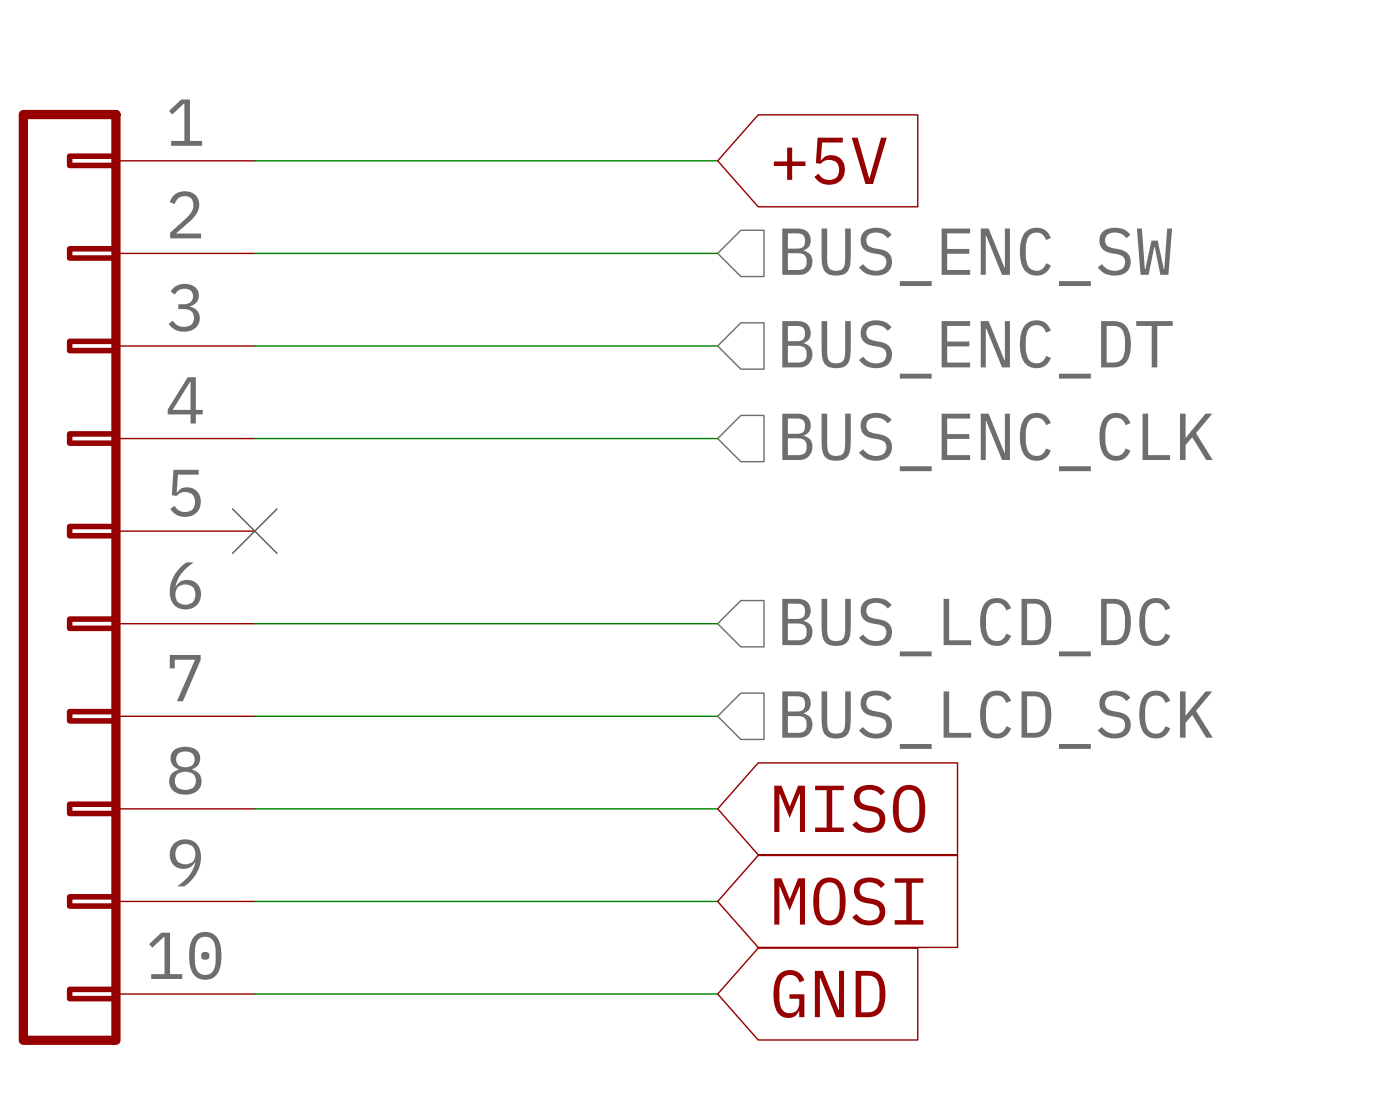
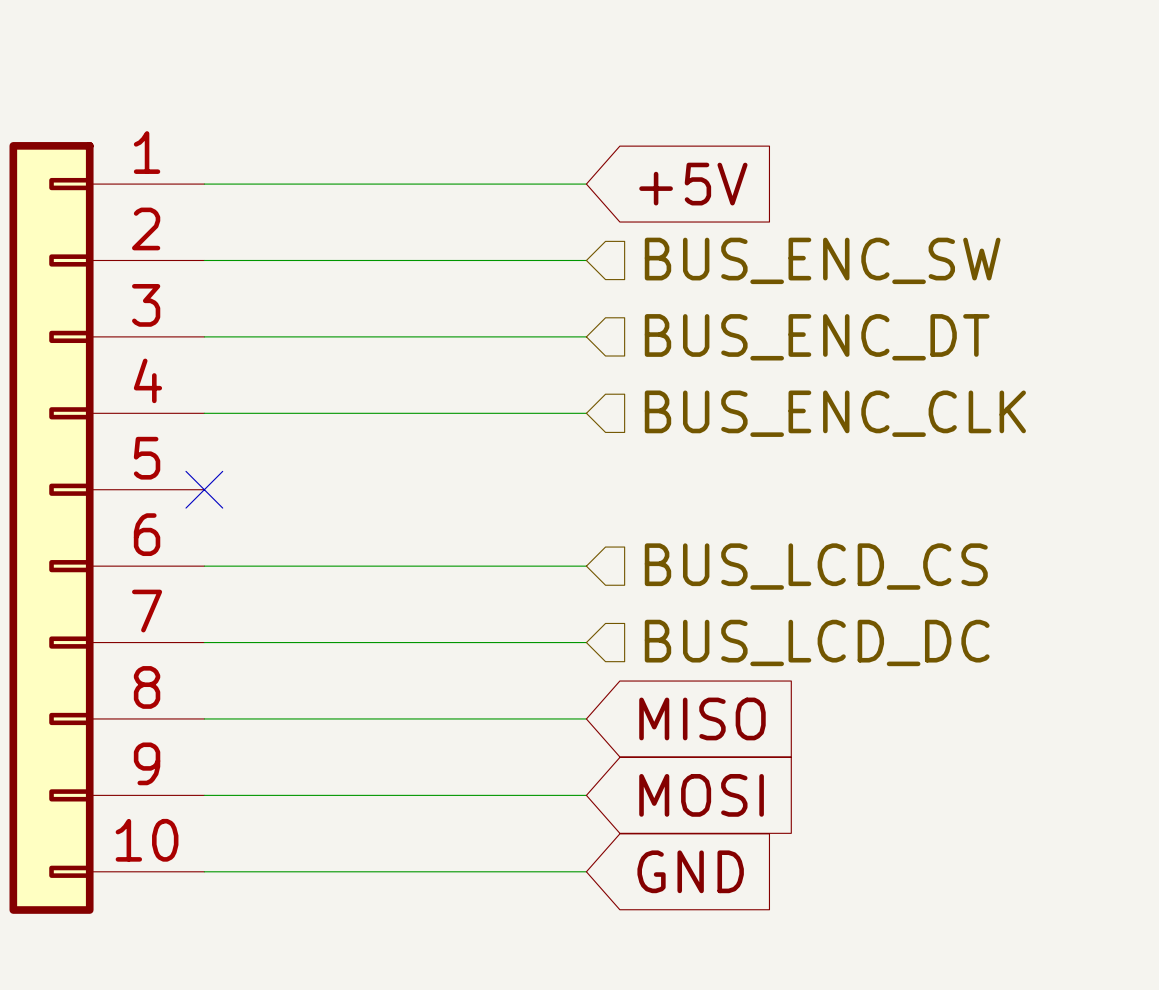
hierarchical label: BUS_LCD_DC (976, 627) -> BUS_LCD_CS (816, 566)
hierarchical label: BUS_LCD_SCK (997, 719) -> BUS_LCD_DC (817, 642)

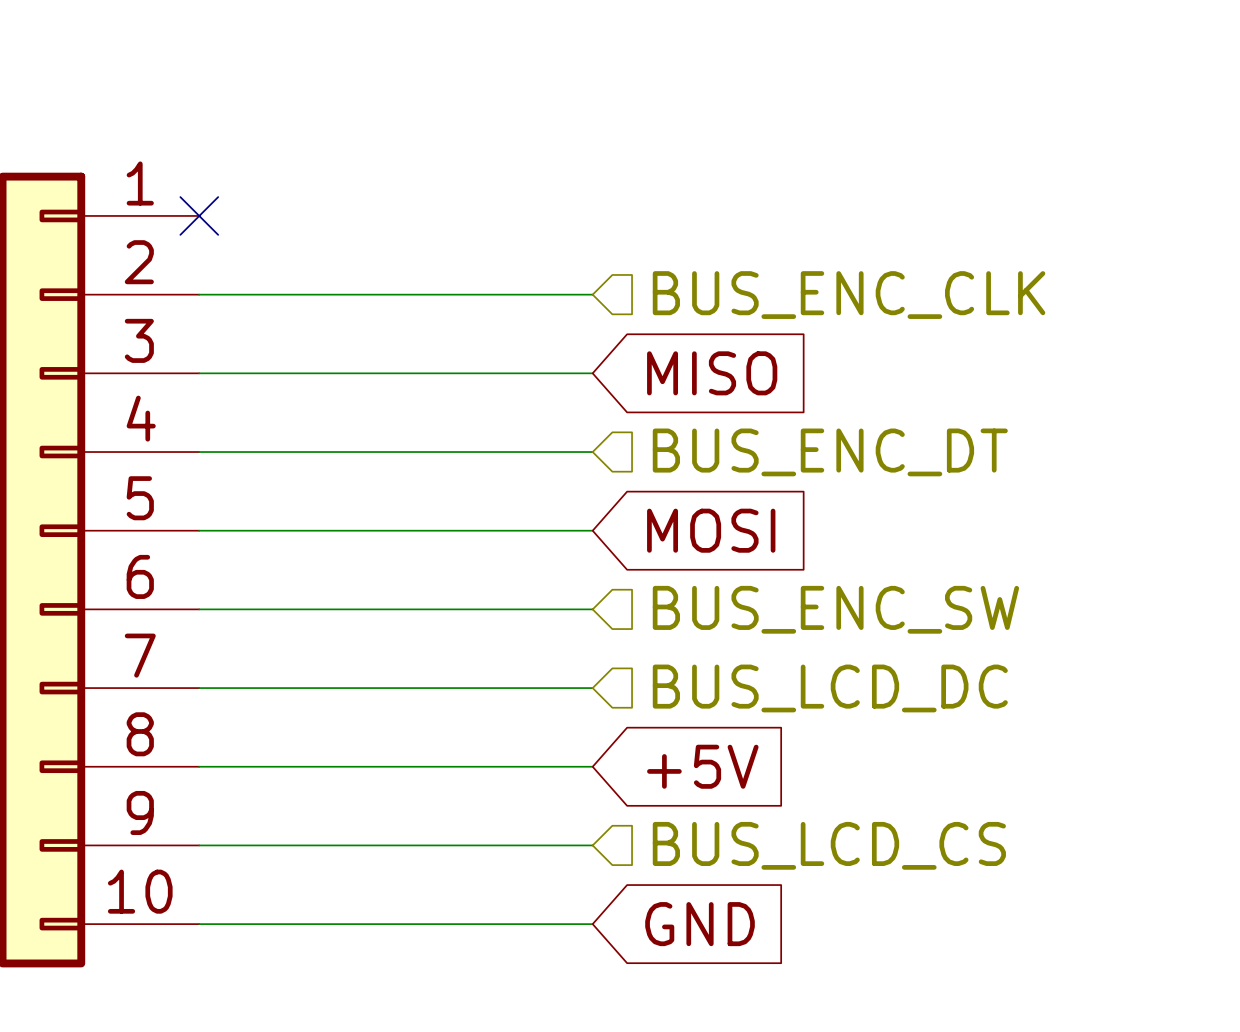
wire: (204, 184) (586, 184) -> (199, 530) (592, 530)
no-connect mark: none -> (199, 215)
global label: +5V (693, 184) -> none
hierarchical label: BUS_ENC_SW (822, 260) -> BUS_ENC_CLK (849, 295)
global label: none -> MISO (712, 373)
hierarchical label: BUS_ENC_DT (817, 337) -> none
hierarchical label: BUS_ENC_CLK (835, 413) -> BUS_ENC_DT (830, 452)
no-connect mark: (204, 489) -> none
hierarchical label: BUS_LCD_CS (816, 566) -> BUS_ENC_SW (835, 609)
global label: MISO (702, 718) -> +5V (702, 766)
global label position: MOSI (701, 795) -> MOSI (711, 530)
hierarchical label: none -> BUS_LCD_CS (829, 845)

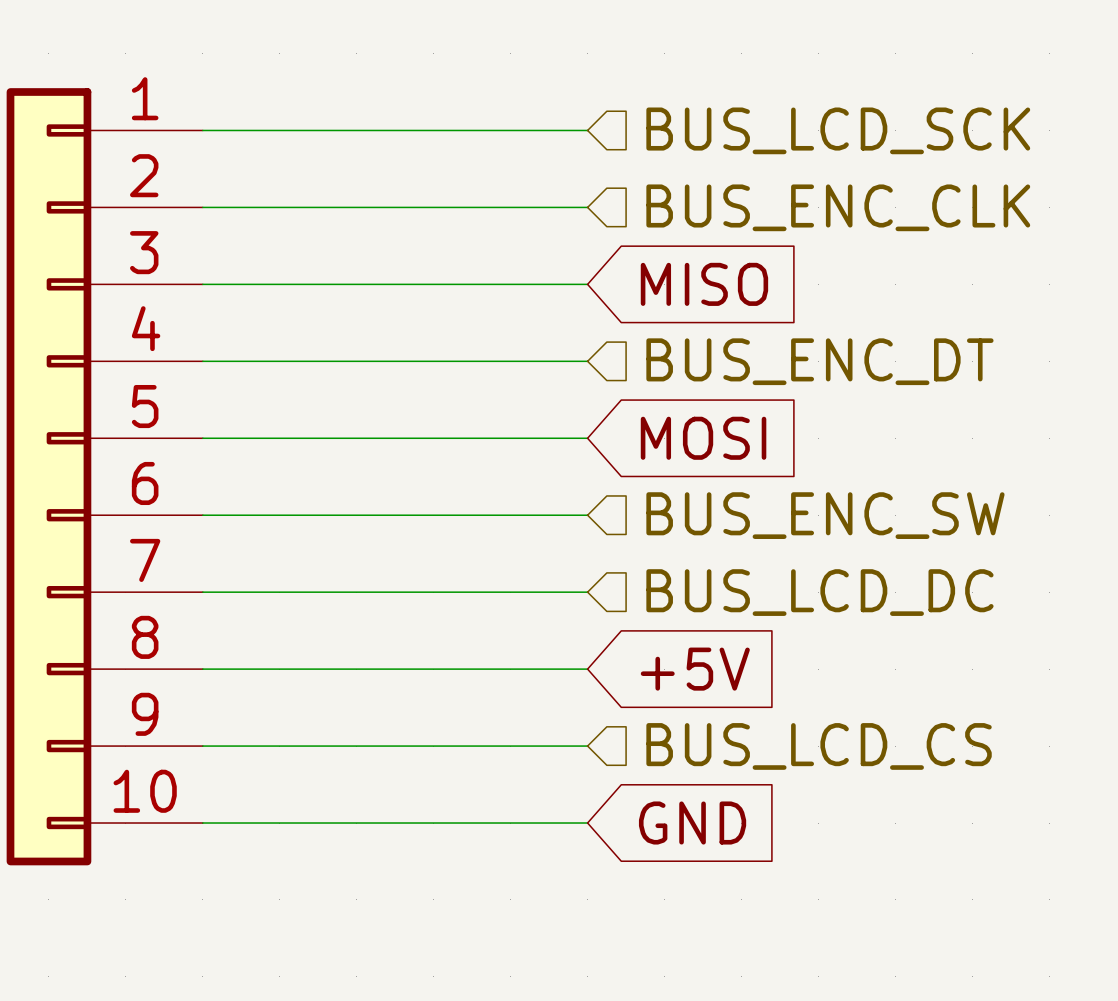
wire: none -> (202, 130) (587, 130)
no-connect mark: (199, 215) -> none
hierarchical label: none -> BUS_LCD_SCK (838, 130)

